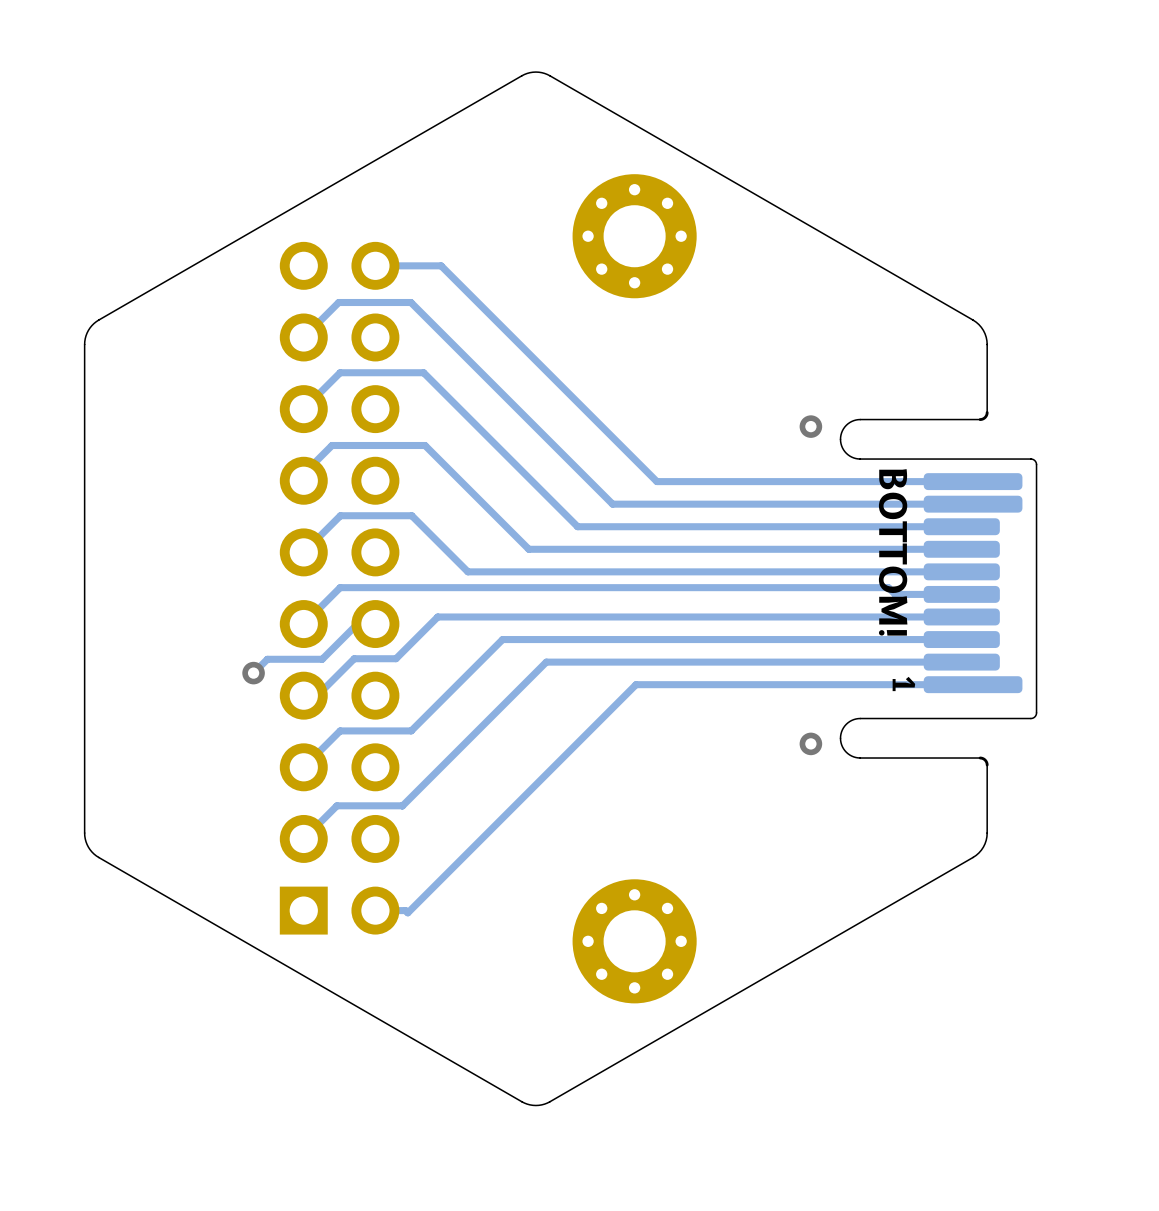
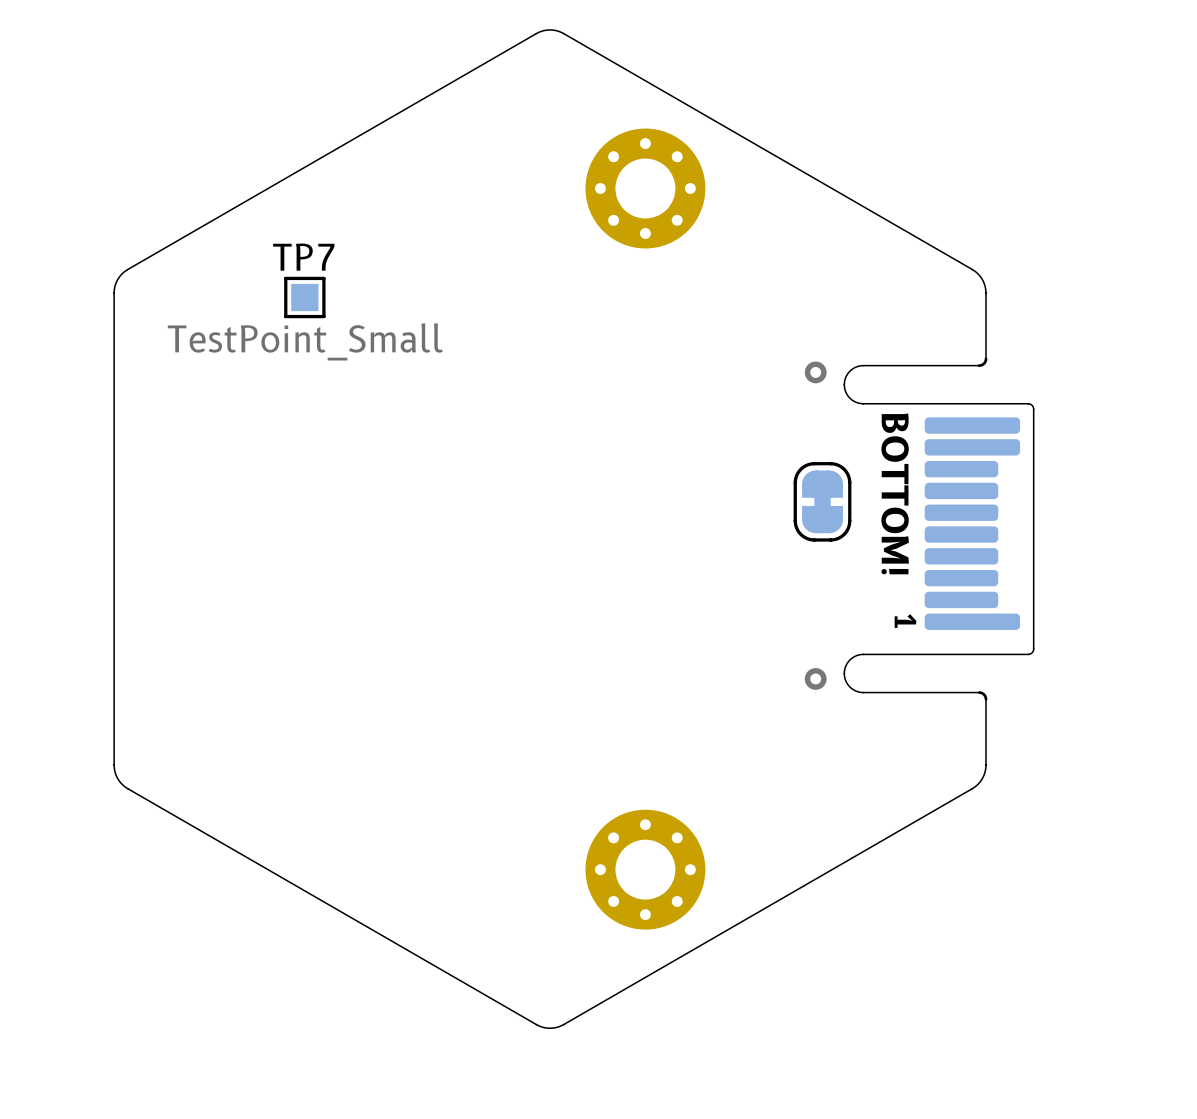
track: (375, 265) (441, 265) (656, 481) (973, 481) -> none
track: (303, 337) (338, 302) (410, 302) (612, 504) (973, 504) -> none
TP7: none -> TestPoint_Small (304, 297)
track: (303, 409) (340, 372) (423, 372) (577, 526) (961, 526) -> none
track: (303, 480) (303, 473) (331, 445) (425, 445) (528, 549) (961, 549) -> none
track: (303, 552) (340, 515) (411, 515) (467, 571) (961, 571) -> none
part: none -> (822, 501)
part: (339, 588) -> none
track: (961, 594) (895, 594) (888, 587) (340, 587) (303, 624) -> none
track: (961, 616) (437, 616) (396, 658) (354, 658) (317, 695) (303, 695) -> none
track: (375, 624) (357, 624) (322, 659) (267, 659) (253, 673) -> none
track: (961, 639) (502, 639) (411, 730) (340, 730) (303, 767) -> none
track: (961, 662) (546, 662) (402, 805) -> none
via: (253, 673) -> none
track: (973, 684) (636, 684) (407, 912) (405, 910) (375, 910) -> none
track: (402, 805) (336, 805) (303, 838) -> none

